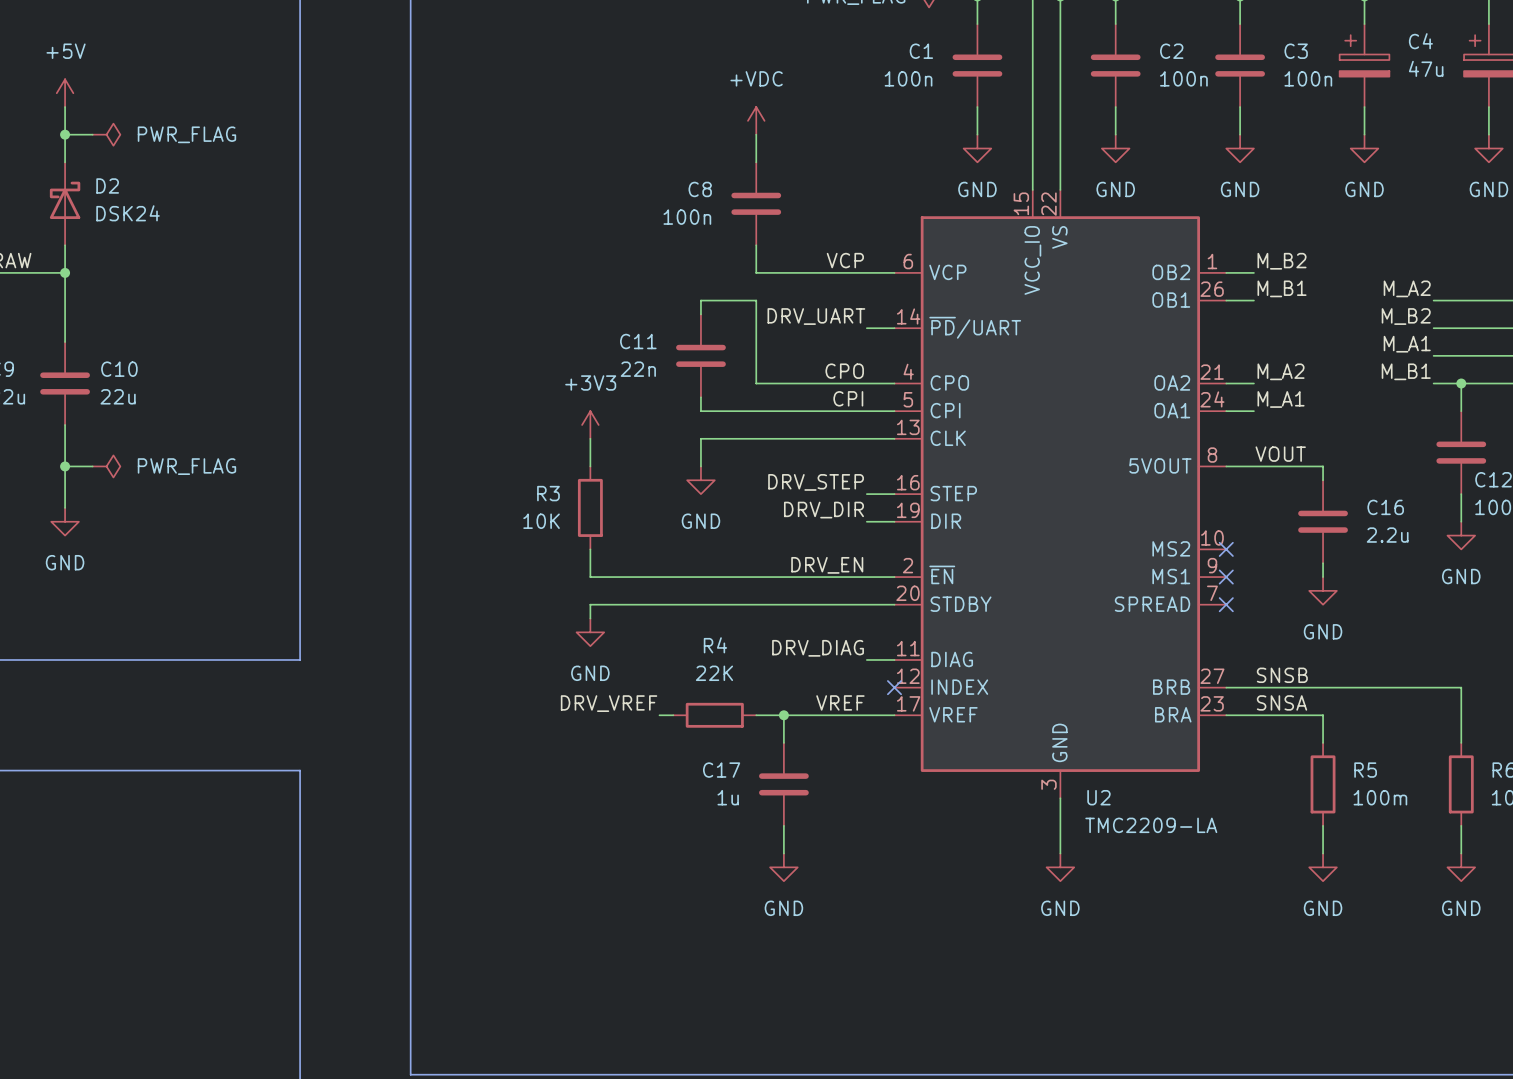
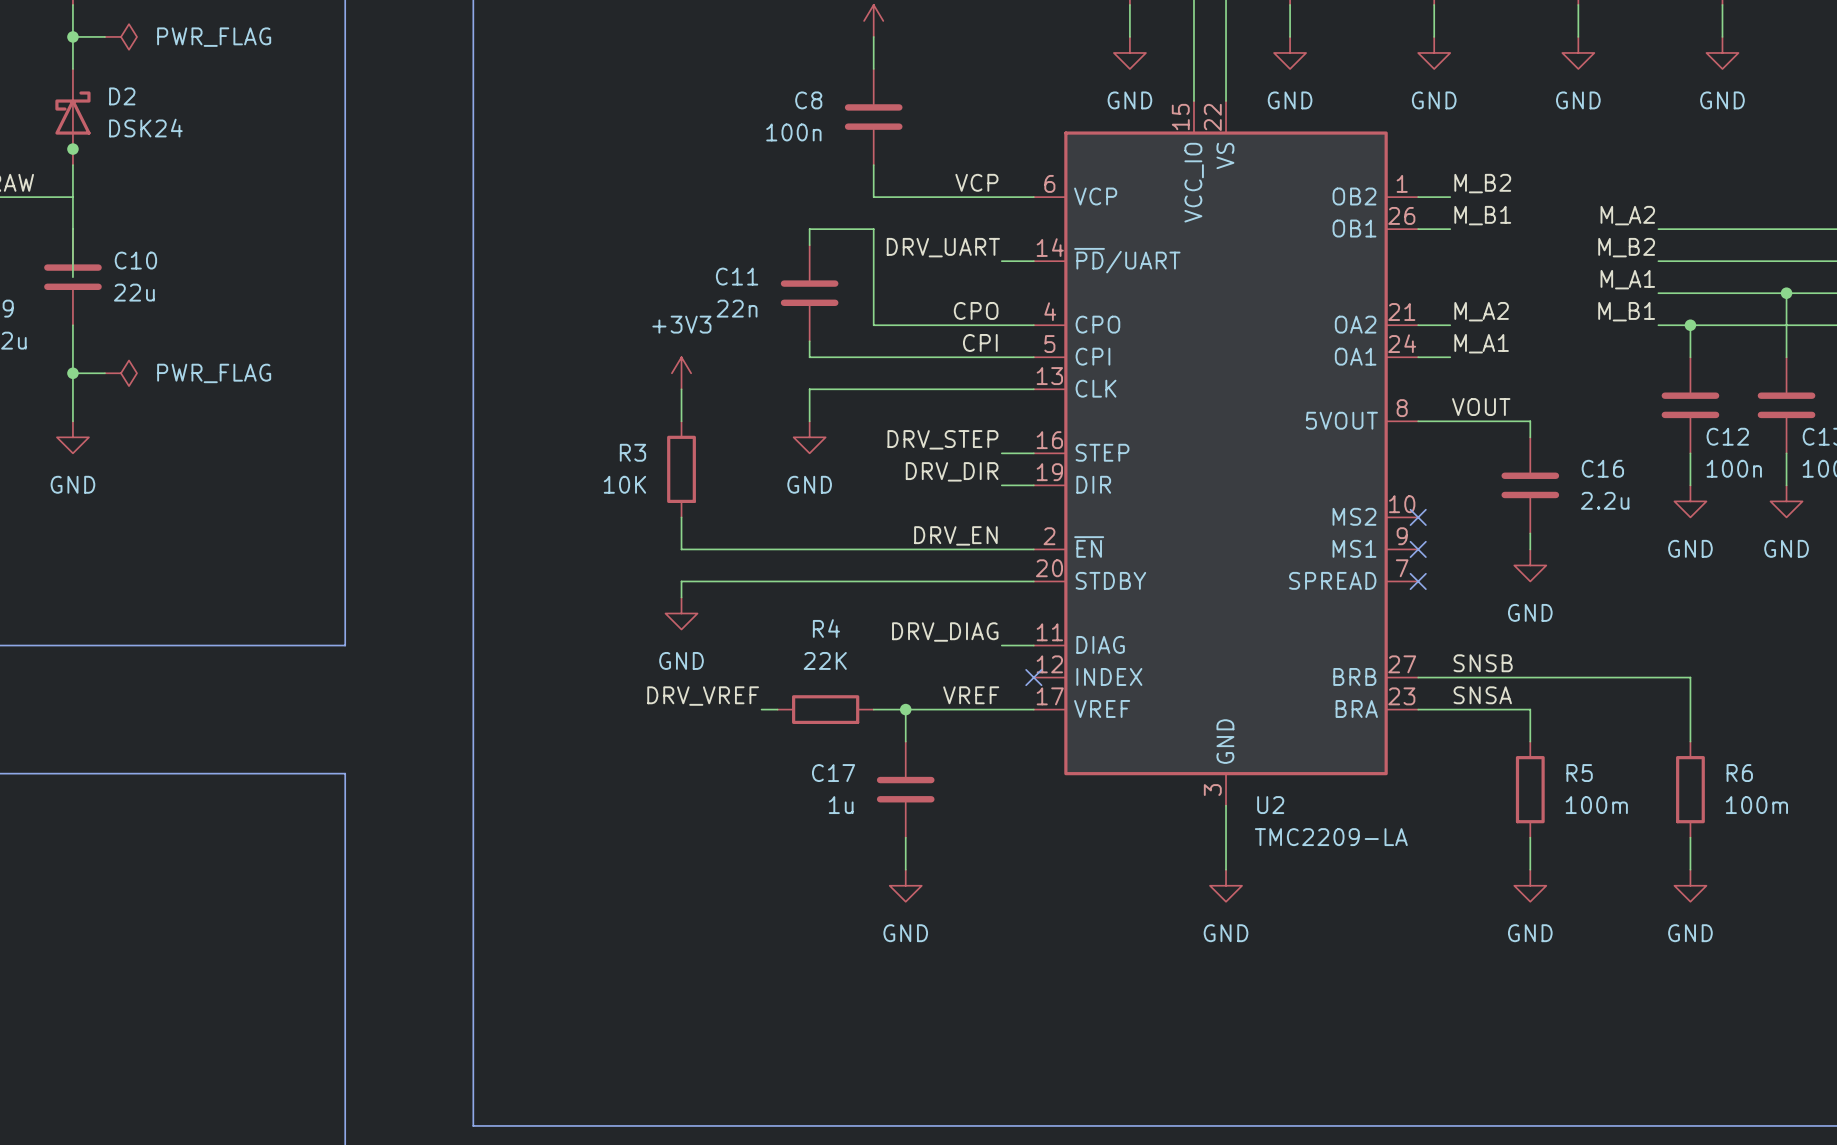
junction position: (65, 272) -> (72, 149)
wire: none -> (72, 325) (72, 373) (104, 373)
C10 position: (65, 383) -> (72, 277)
junction position: (65, 466) -> (72, 373)
wire: (92, 466) (65, 466) (65, 507) -> none
power symbol position: PWR_FLAG (106, 466) -> PWR_FLAG (121, 373)
power symbol position: GND (65, 521) -> GND (72, 437)

